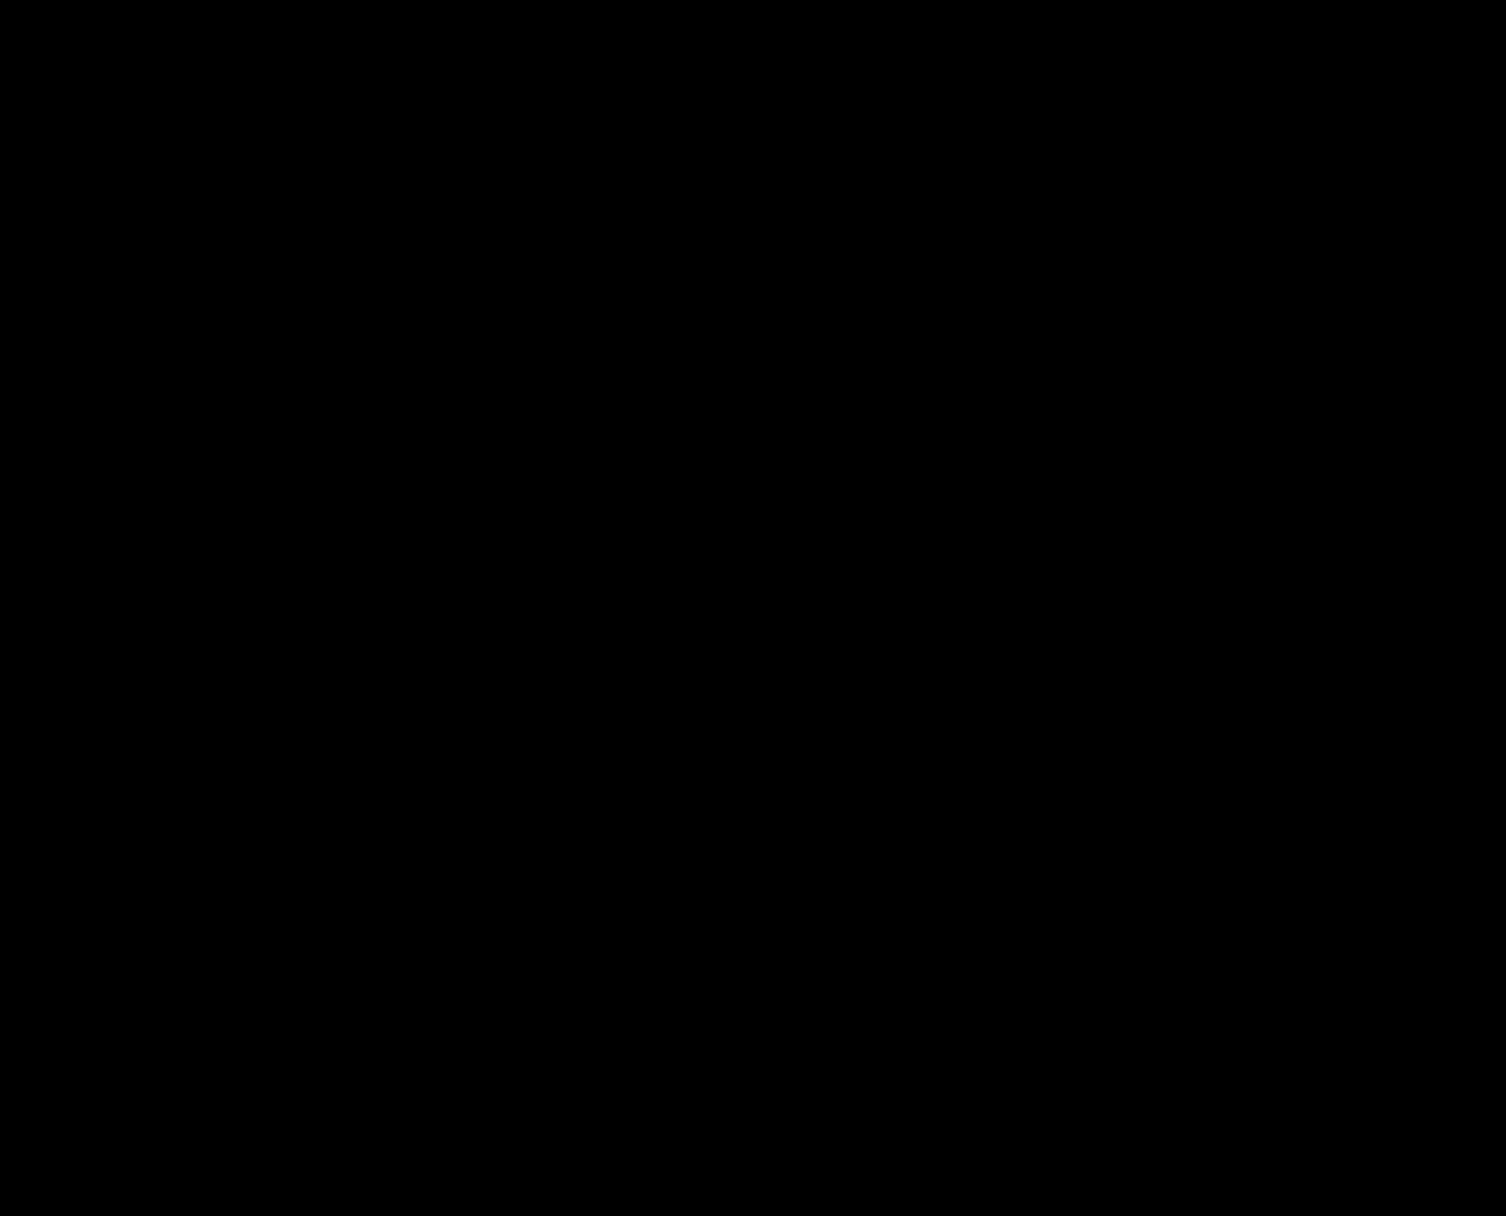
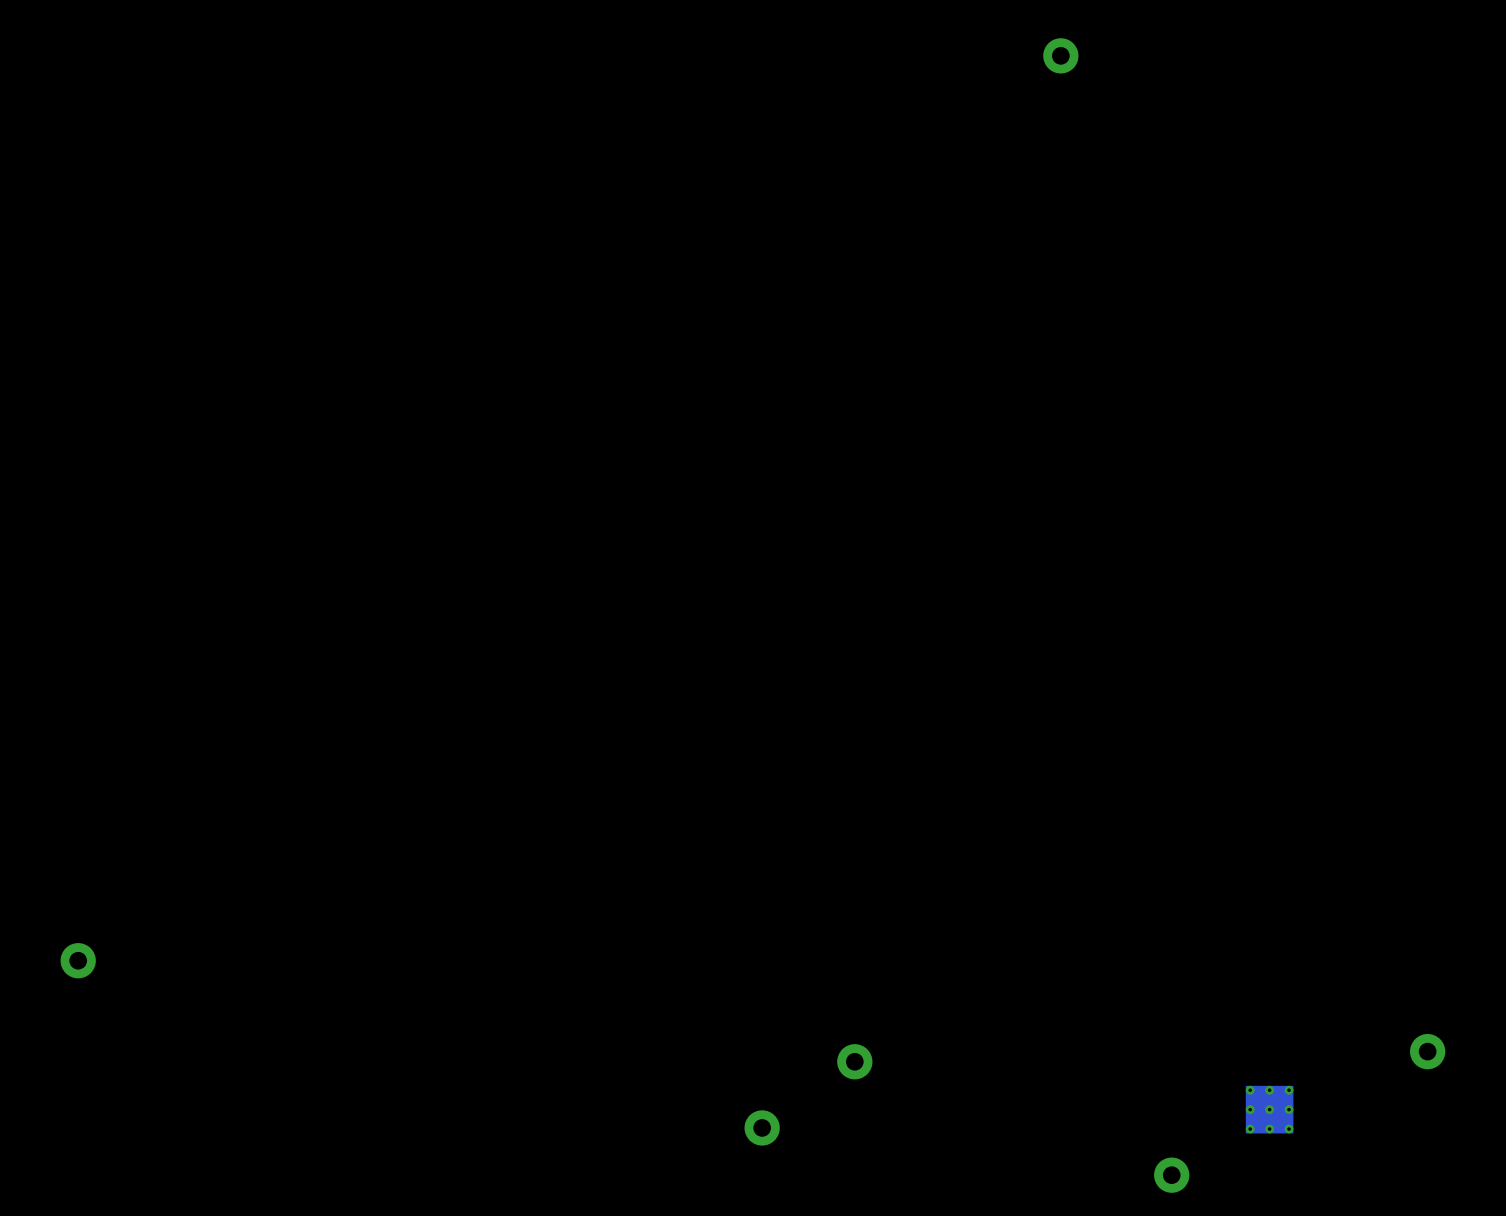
part: none -> (1060, 55)
part: none -> (78, 960)
part: none -> (1427, 1051)
part: none -> (854, 1061)
part: none -> (1269, 1109)
part: none -> (762, 1127)
part: none -> (1171, 1175)

